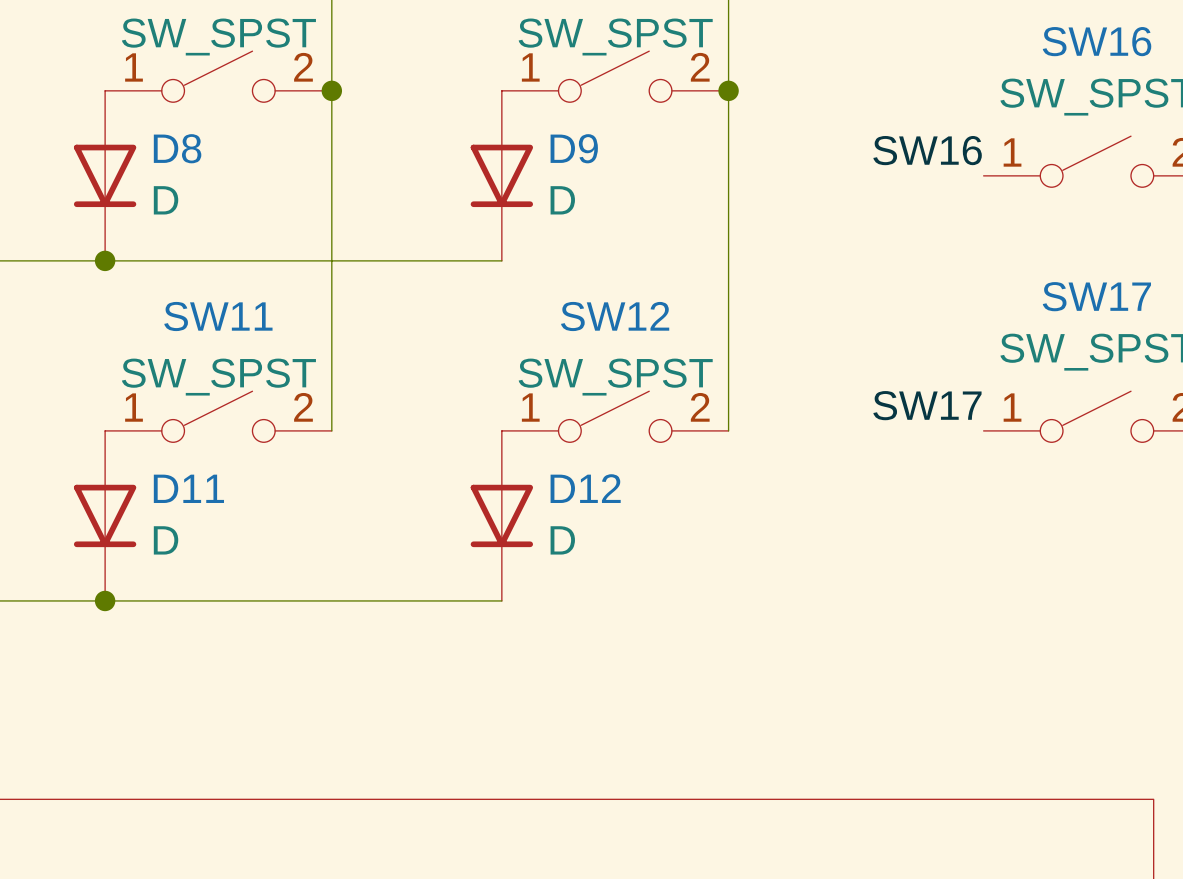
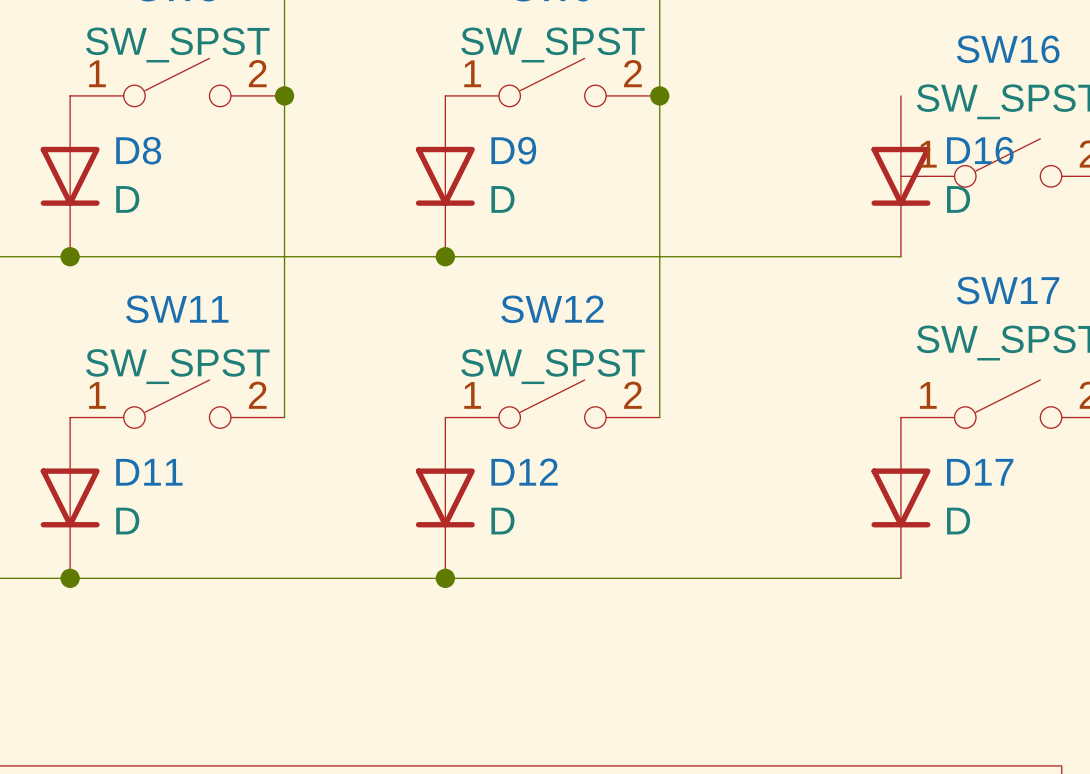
label: SW16 (927, 150) -> none
D16: none -> D (900, 176)
wire: none -> (445, 256) (900, 256)
junction: none -> (445, 256)
label: SW17 (927, 405) -> none
D17: none -> D (900, 497)
wire: none -> (445, 578) (900, 578)
junction: none -> (445, 578)

